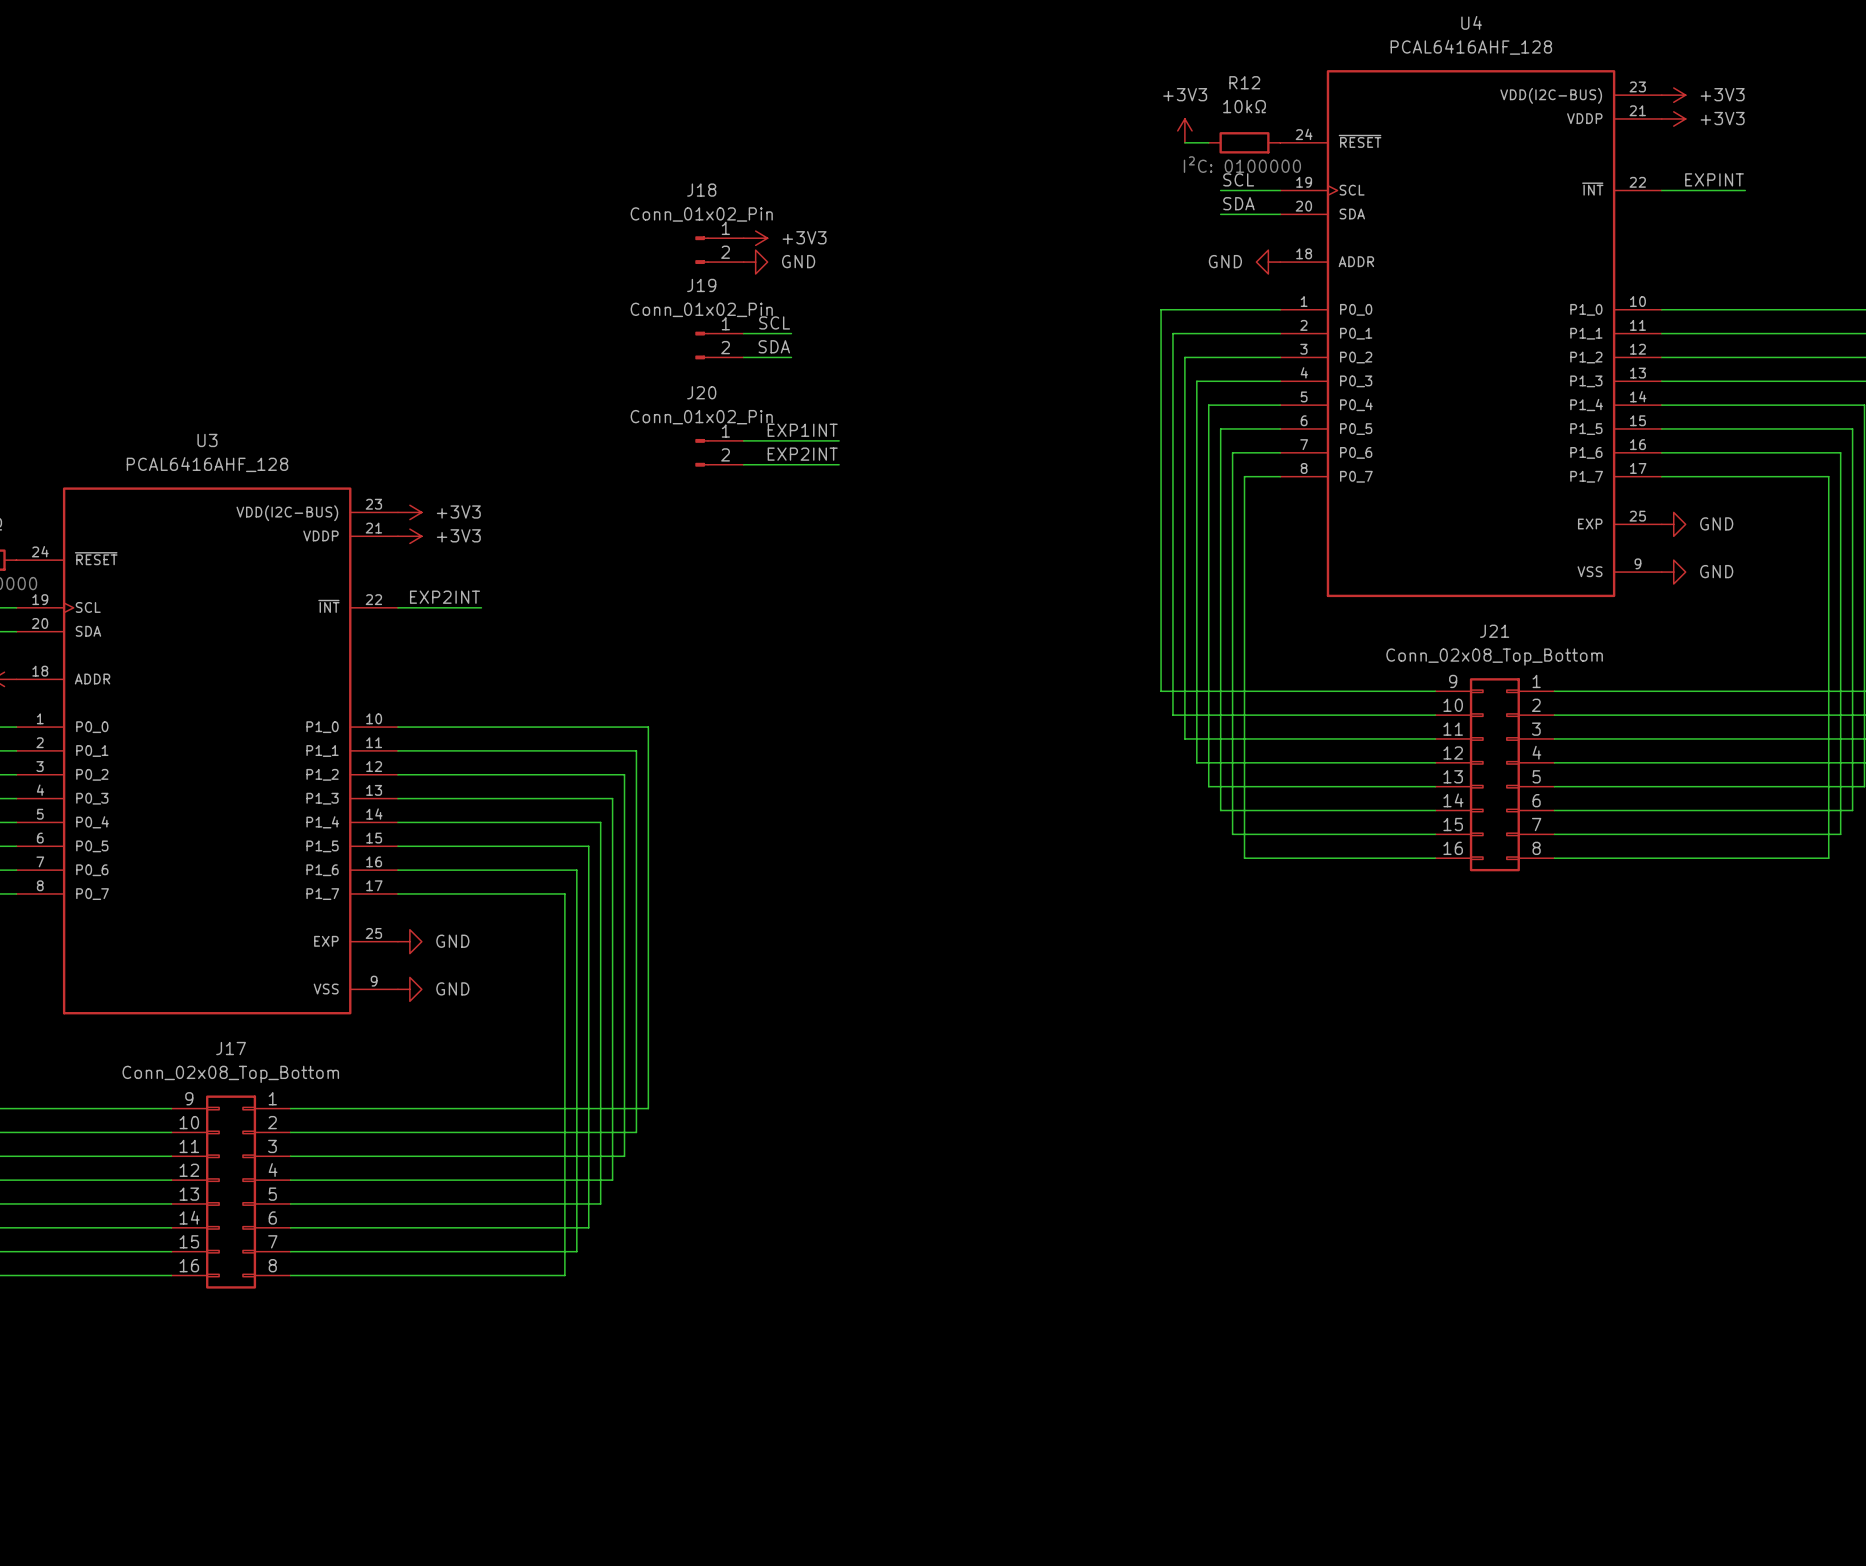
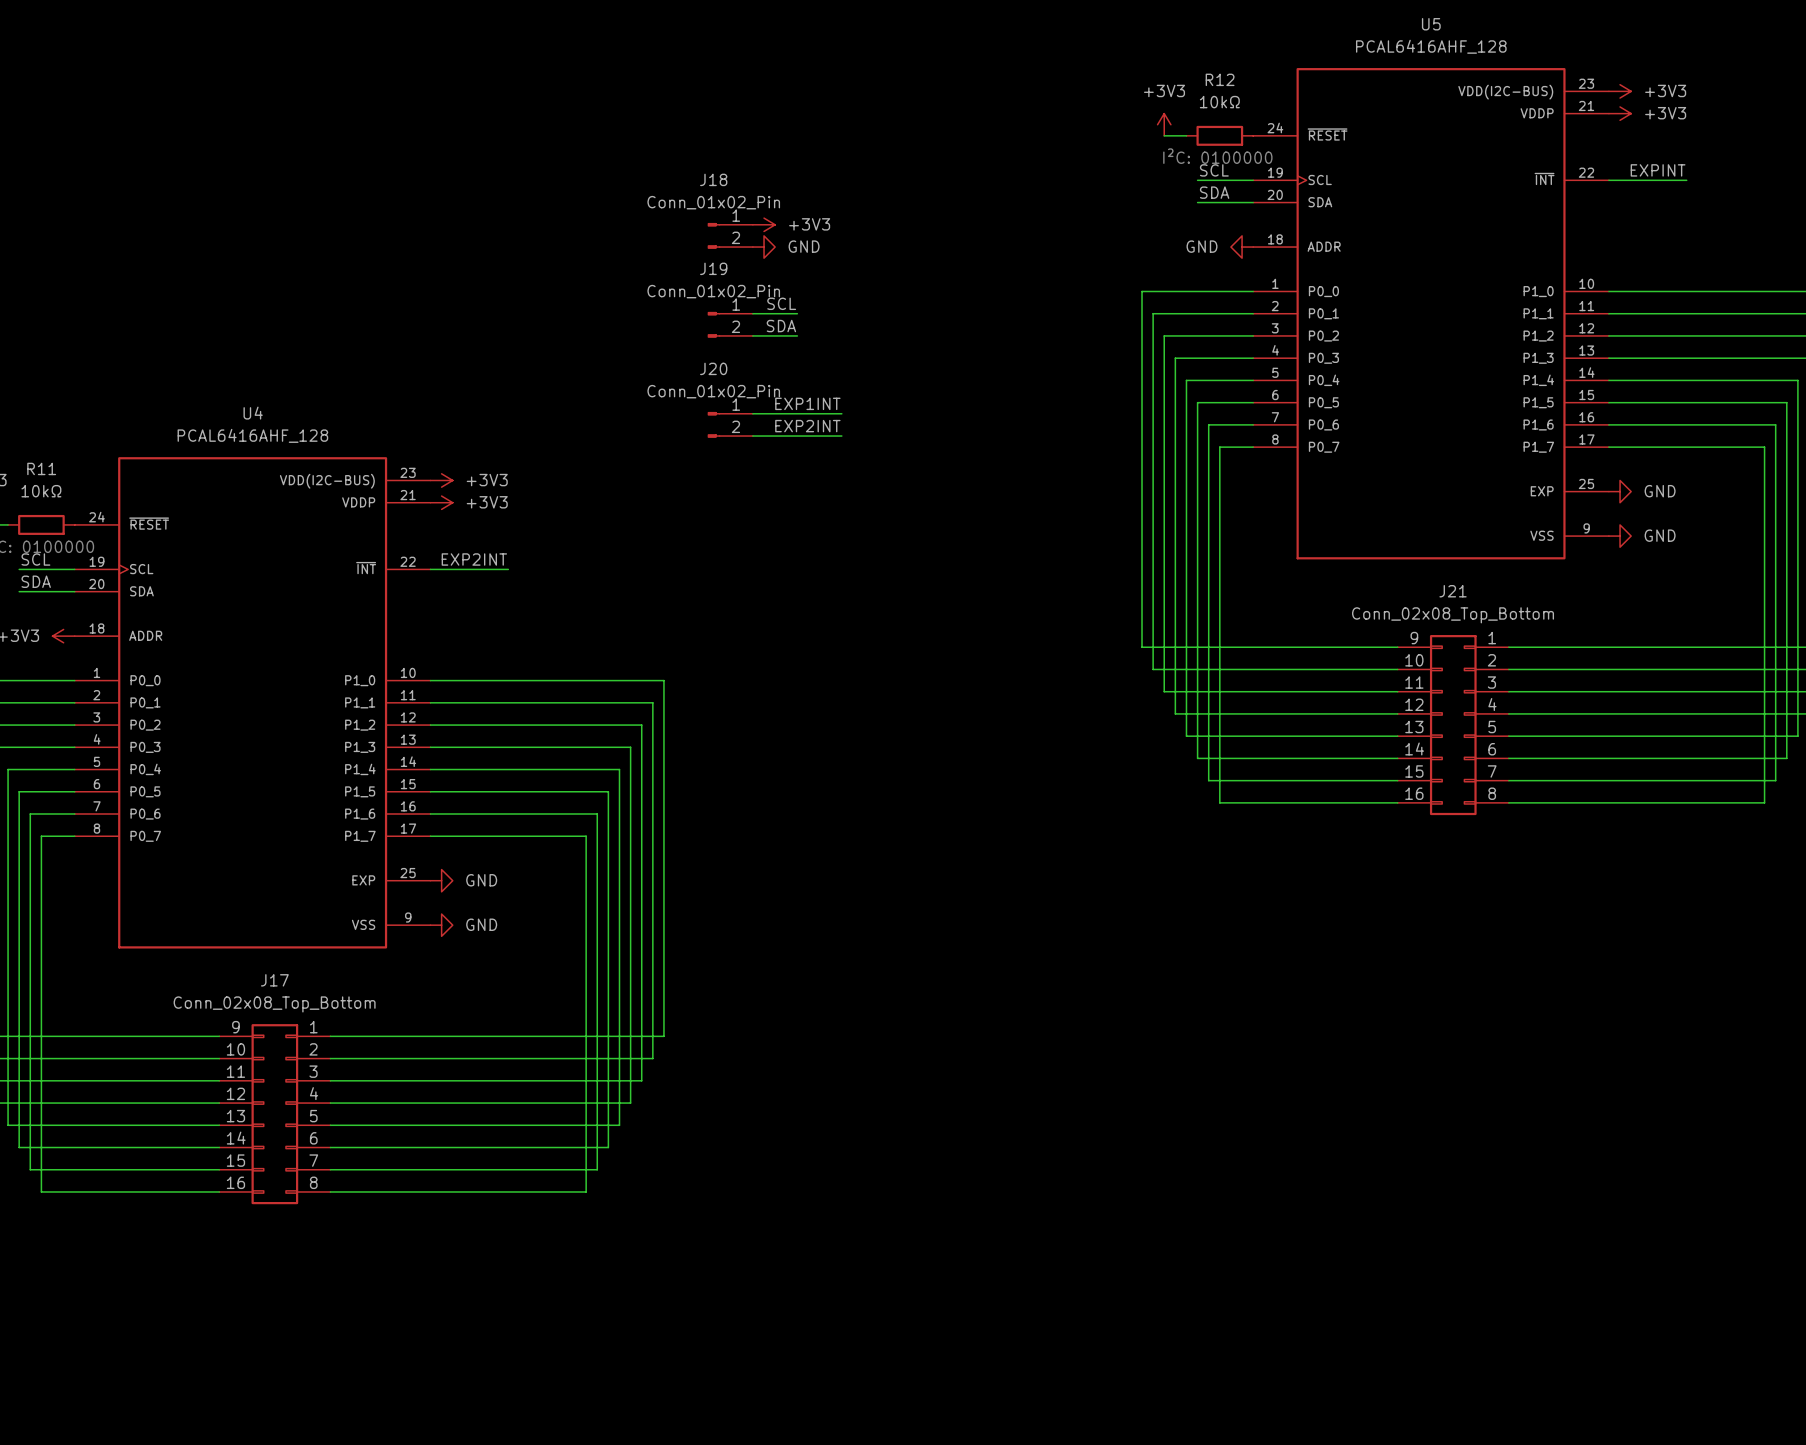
U4 name: U4 (1471, 22) -> U5 (1431, 24)
U3 name: U3 (207, 440) -> U4 (253, 413)

